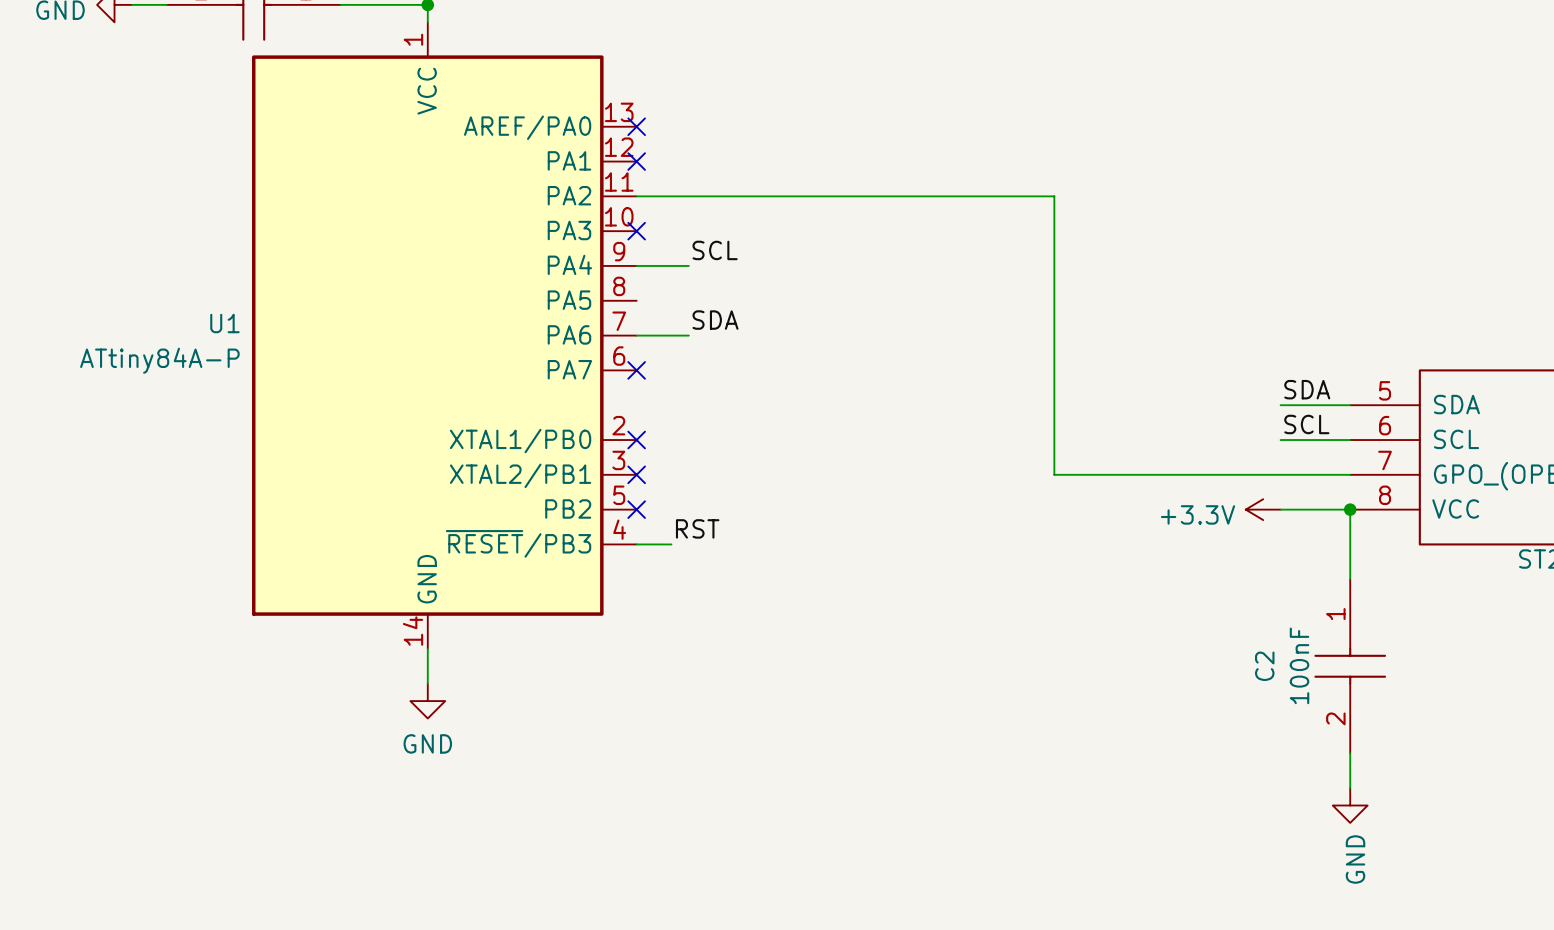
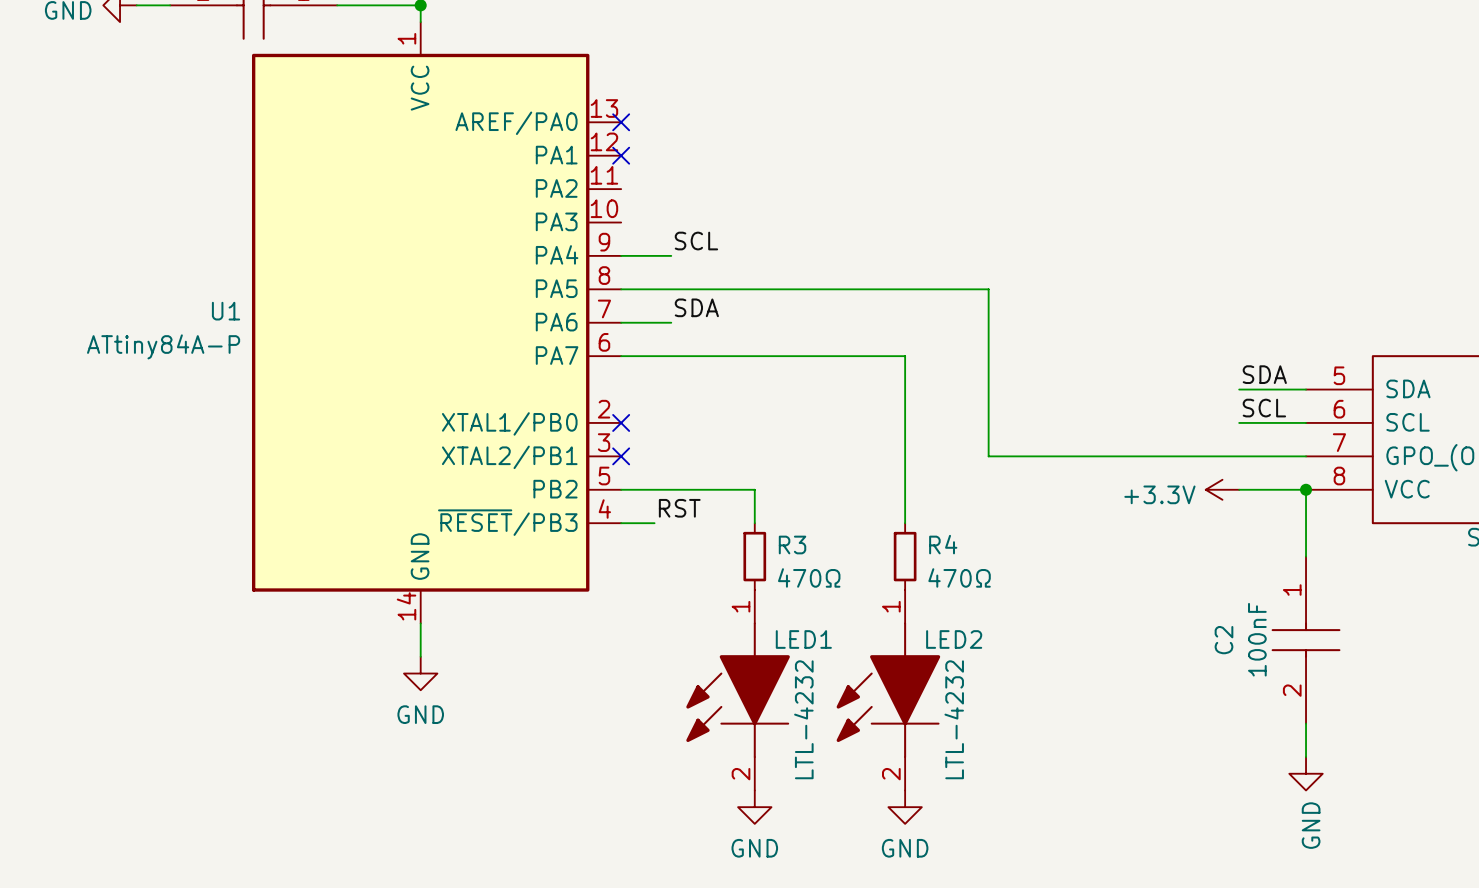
wire: (636, 196) (1054, 196) (1054, 474) -> (621, 289) (988, 289) (988, 456) (1022, 456)
no-connect mark: (636, 231) -> none
wire: none -> (621, 356) (905, 356) (905, 523)
no-connect mark: (636, 370) -> none
wire: none -> (621, 489) (754, 489) (754, 523)
no-connect mark: (636, 509) -> none
R3: none -> 470Ω (754, 556)
R4: none -> 470Ω (905, 556)
LED1: none -> LTL-4232 (738, 690)
LED2: none -> LTL-4232 (888, 690)
power symbol: none -> GND (754, 807)
power symbol: none -> GND (905, 807)

